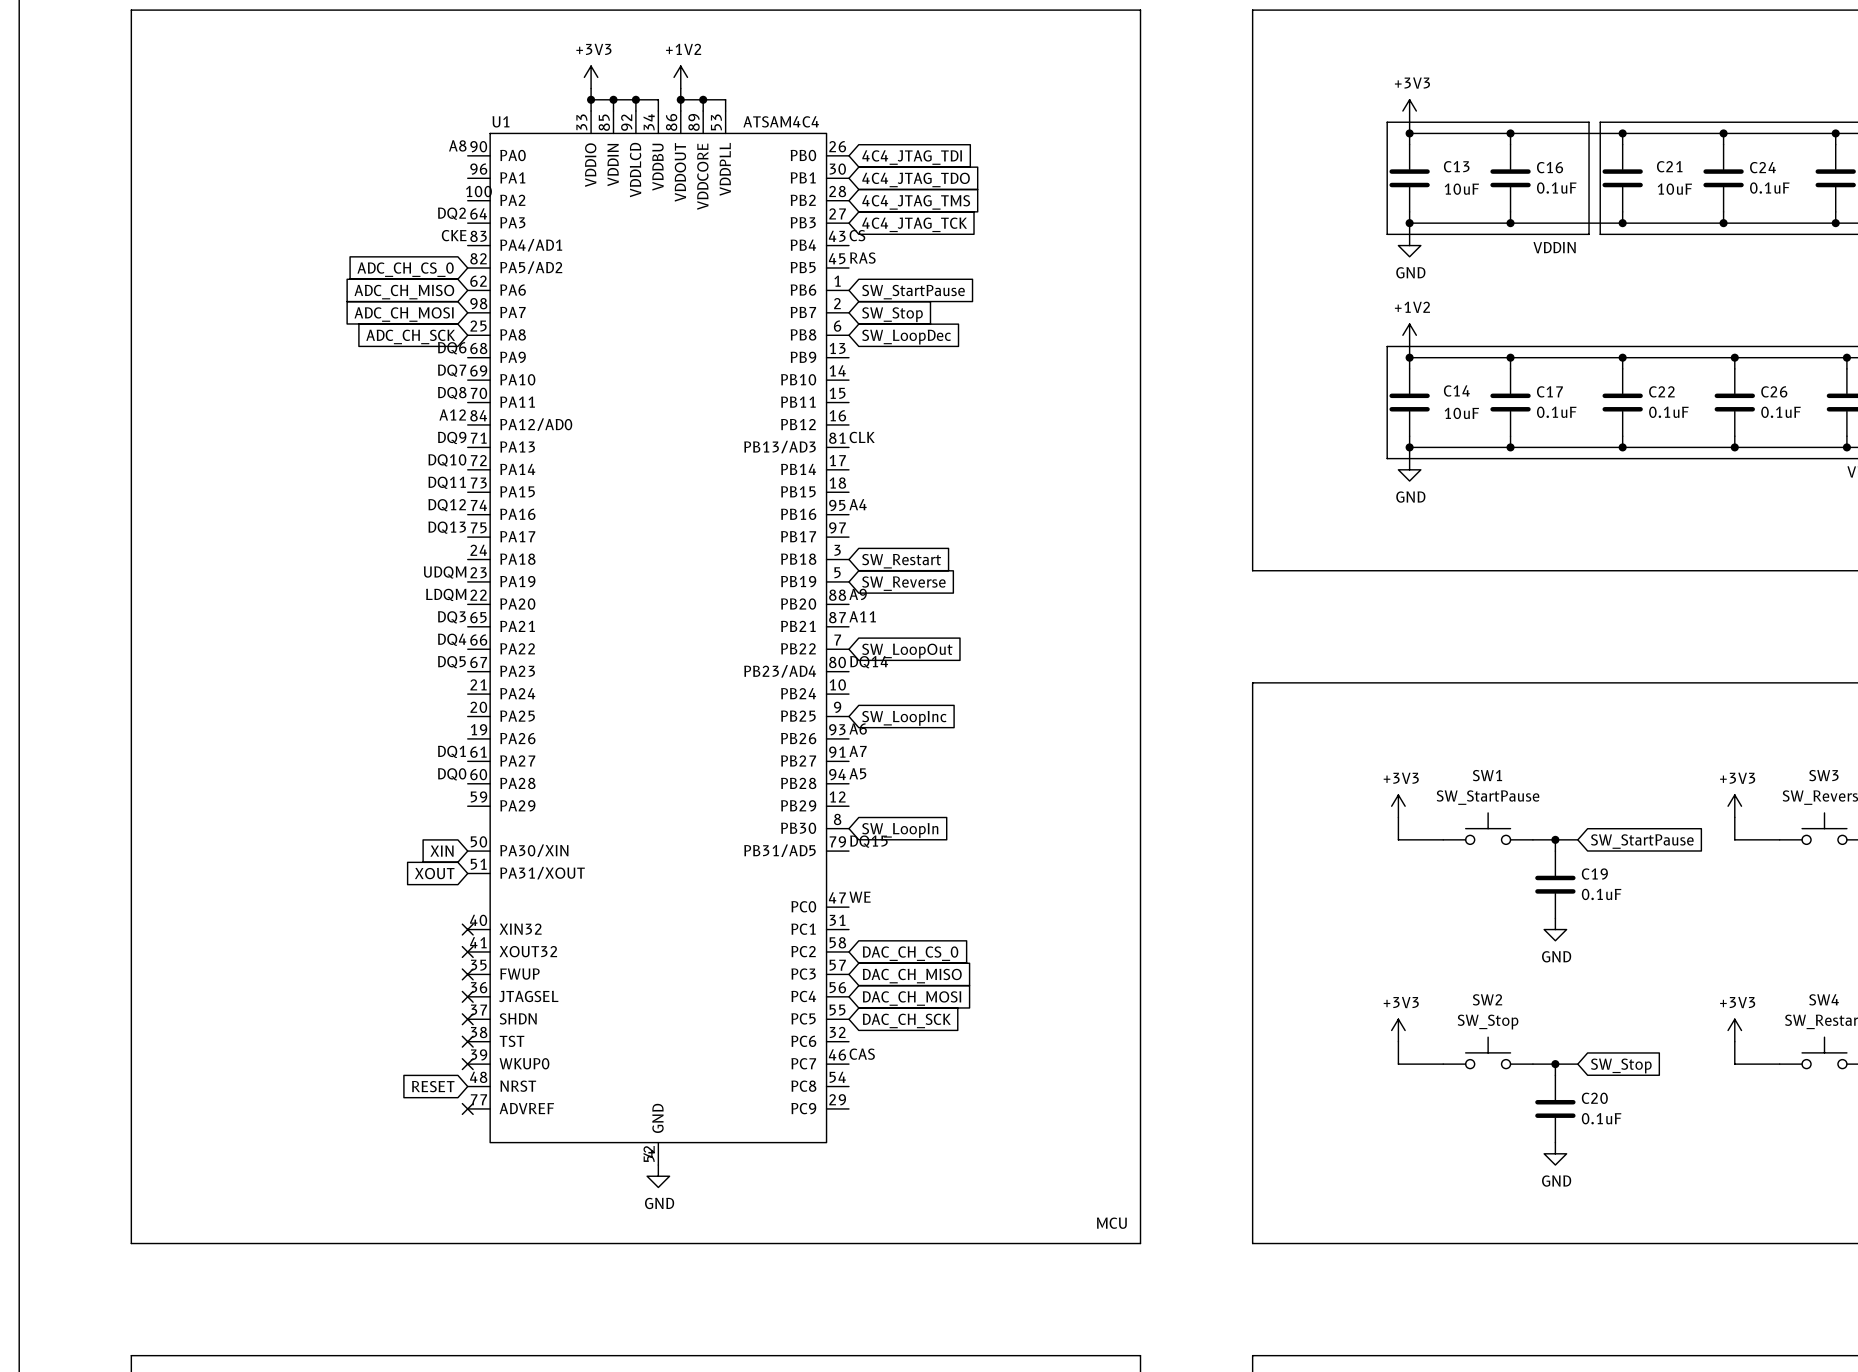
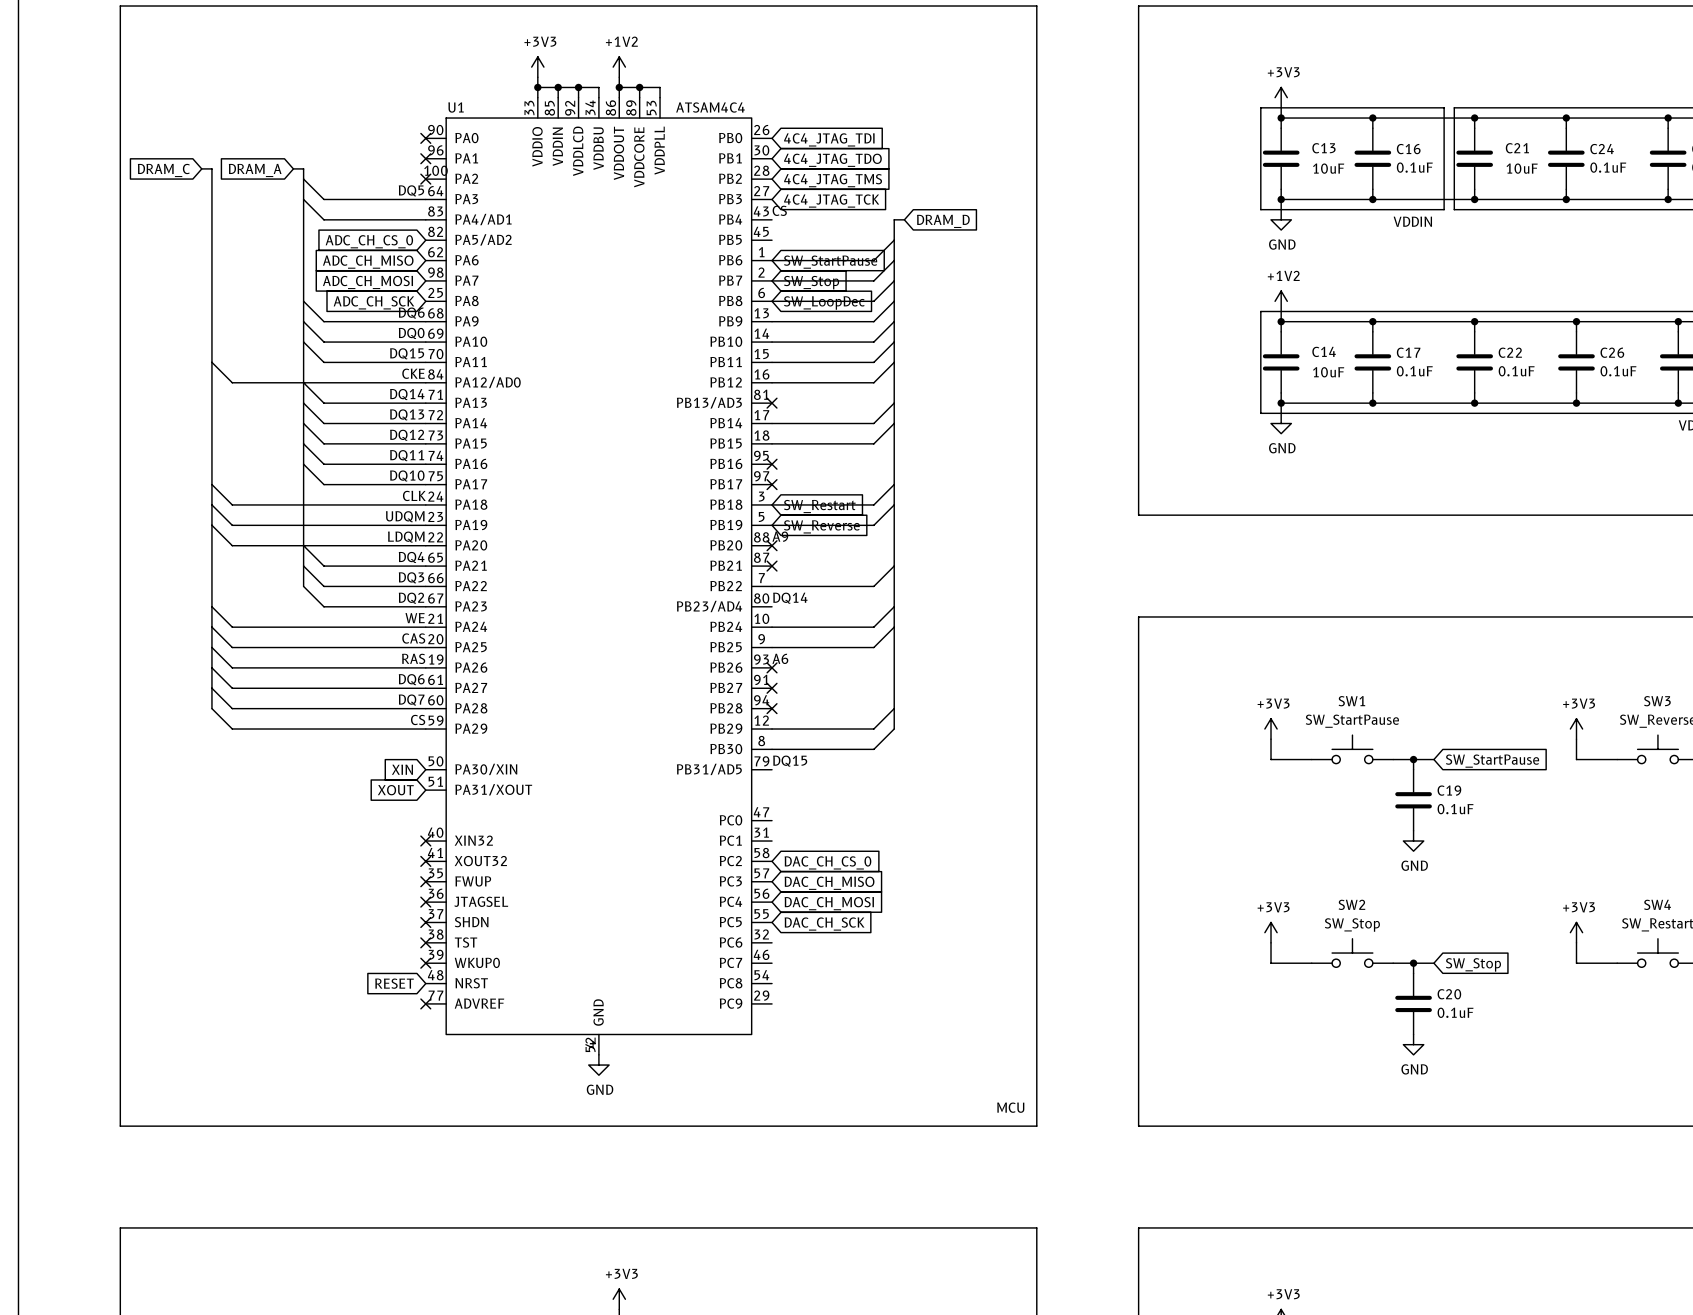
label: A8 (457, 145) -> none
no-connect mark: none -> (425, 138)
no-connect mark: none -> (425, 158)
bus: none -> (201, 168) (211, 168) (211, 708)
bus: none -> (293, 168) (303, 168) (303, 586)
global label: none -> DRAM_C (163, 170)
global label: none -> DRAM_A (255, 170)
wire: none -> (303, 179) (323, 199) (425, 199)
no-connect mark: none -> (425, 179)
label: DQ2 (451, 213) -> DQ5 (411, 190)
wire: none -> (303, 199) (323, 219) (425, 219)
label: CKE (454, 235) -> none
bus: none -> (904, 219) (894, 219) (894, 729)
global label: none -> DRAM_D (943, 221)
label: RAS (862, 258) -> none
wire: none -> (894, 240) (873, 260) (772, 260)
wire: none -> (894, 260) (873, 280) (772, 280)
wire: none -> (894, 280) (873, 301) (772, 301)
wire: none -> (303, 301) (323, 321) (425, 321)
wire: none -> (894, 301) (873, 321) (772, 321)
wire: none -> (303, 321) (323, 342) (425, 342)
wire: none -> (894, 321) (873, 342) (772, 342)
label: DQ7 (452, 370) -> DQ0 (411, 333)
wire: none -> (303, 342) (323, 362) (425, 362)
wire: none -> (894, 342) (873, 362) (772, 362)
label: DQ8 (452, 393) -> DQ15 (407, 353)
wire: none -> (211, 362) (232, 382) (425, 382)
wire: none -> (894, 362) (873, 382) (772, 382)
label: A12 (452, 414) -> CKE (413, 373)
wire: none -> (303, 382) (323, 403) (425, 403)
label: DQ9 (452, 437) -> DQ14 (407, 394)
label: CLK (862, 437) -> none
wire: none -> (303, 403) (323, 423) (425, 423)
no-connect mark: none -> (772, 403)
wire: none -> (894, 403) (873, 423) (772, 423)
label: DQ10 (447, 460) -> DQ13 (407, 414)
wire: none -> (303, 423) (323, 443) (425, 443)
wire: none -> (894, 423) (873, 443) (772, 443)
label: DQ11 (447, 482) -> DQ12 (407, 435)
wire: none -> (303, 443) (323, 464) (425, 464)
label: A4 (858, 504) -> none
label: DQ12 (447, 505) -> DQ11 (407, 455)
wire: none -> (303, 464) (323, 484) (425, 484)
no-connect mark: none -> (772, 464)
label: DQ13 (447, 527) -> DQ10 (407, 476)
wire: none -> (211, 484) (232, 504) (425, 504)
no-connect mark: none -> (772, 484)
wire: none -> (894, 484) (873, 504) (772, 504)
label: none -> CLK (414, 495)
wire: none -> (211, 504) (232, 525) (425, 525)
wire: none -> (894, 504) (873, 525) (772, 525)
wire: none -> (211, 525) (232, 545) (425, 545)
wire: none -> (303, 545) (323, 566) (425, 566)
no-connect mark: none -> (772, 545)
label: A11 (862, 616) -> none
label: DQ3 (451, 617) -> DQ4 (411, 557)
wire: none -> (303, 566) (323, 586) (425, 586)
no-connect mark: none -> (772, 566)
wire: none -> (894, 566) (873, 586) (772, 586)
label: DQ4 (452, 639) -> DQ3 (411, 577)
wire: none -> (303, 586) (323, 606) (425, 606)
global label: SW_LoopOut (907, 651) -> none
label: DQ5 (451, 662) -> DQ2 (411, 598)
wire: none -> (211, 606) (232, 627) (425, 627)
wire: none -> (894, 606) (873, 627) (772, 627)
label: none -> WE (415, 618)
wire: none -> (211, 627) (232, 647) (425, 647)
wire: none -> (894, 627) (873, 647) (772, 647)
label: none -> CAS (413, 638)
wire: none -> (211, 647) (232, 667) (425, 667)
global label: SW_LoopInc (904, 718) -> none
label: none -> RAS (413, 658)
wire: none -> (211, 667) (232, 688) (425, 688)
no-connect mark: none -> (772, 667)
label: DQ1 (451, 751) -> DQ6 (411, 679)
label: A7 (858, 751) -> none
wire: none -> (211, 688) (232, 708) (425, 708)
no-connect mark: none -> (772, 688)
label: A5 (857, 773) -> none
label: DQ0 (452, 774) -> DQ7 (411, 700)
wire: none -> (211, 708) (232, 729) (425, 729)
no-connect mark: none -> (772, 708)
wire: none -> (894, 708) (873, 729) (772, 729)
label: none -> CS (418, 719)
wire: none -> (894, 729) (873, 749) (772, 749)
global label: SW_LoopIn (900, 830) -> none
label: WE (860, 897) -> none
label: CAS (862, 1054) -> none

